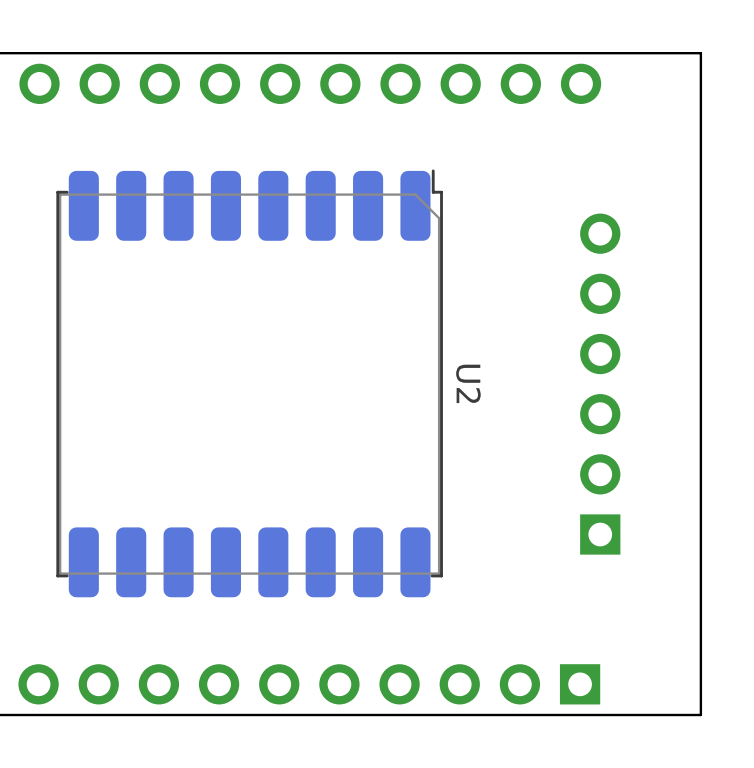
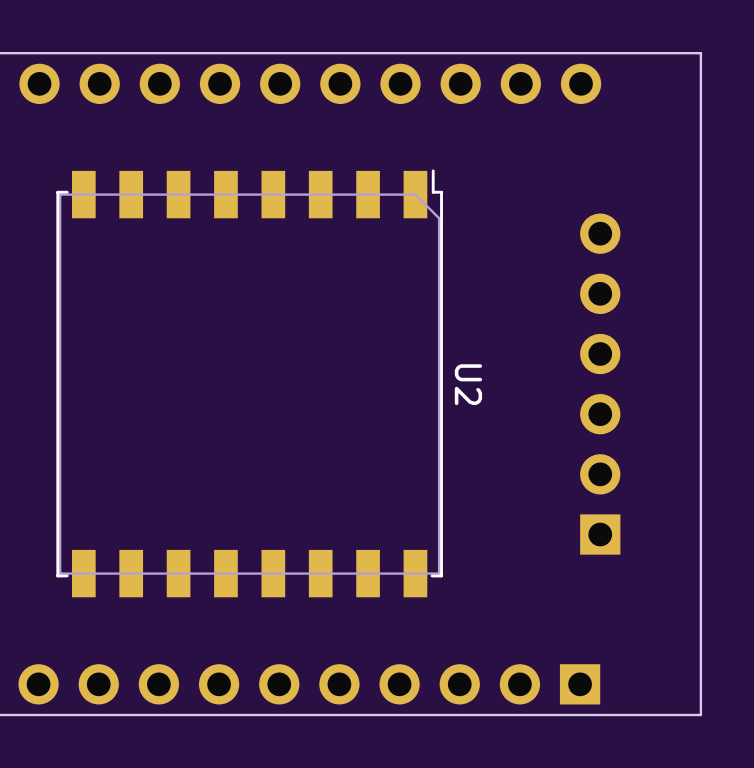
U2 footprint: [56, 169, 443, 598] -> [56, 169, 443, 598]

